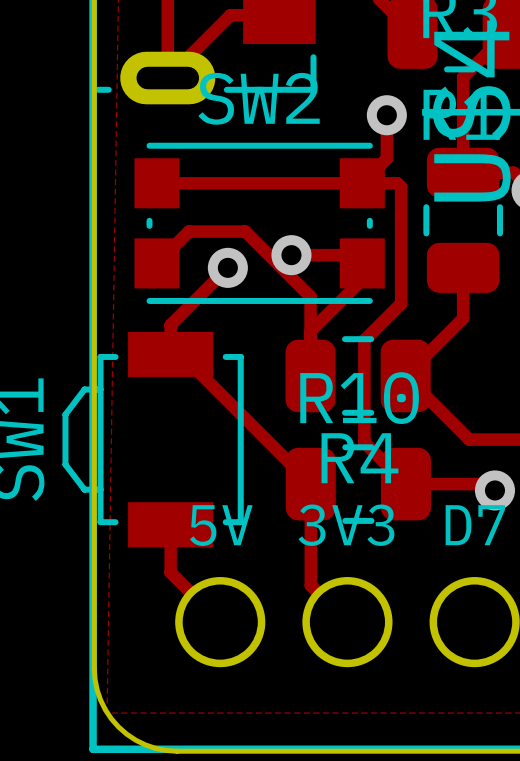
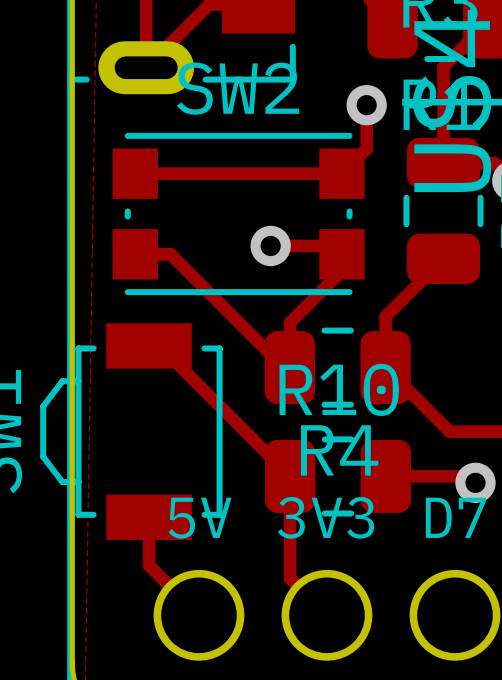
track: (362, 183) (397, 183) (401, 187) (401, 303) (364, 340) (364, 442) (405, 484) -> none
track: (157, 263) (188, 231) (245, 231) (310, 296) (310, 331) -> (135, 254) (170, 254) (283, 367) (289, 367)
track: (227, 267) (170, 325) (170, 354) -> none
via: (227, 267) -> none
track: (463, 267) (463, 318) (405, 375) -> (443, 258) (385, 316) (385, 367)

